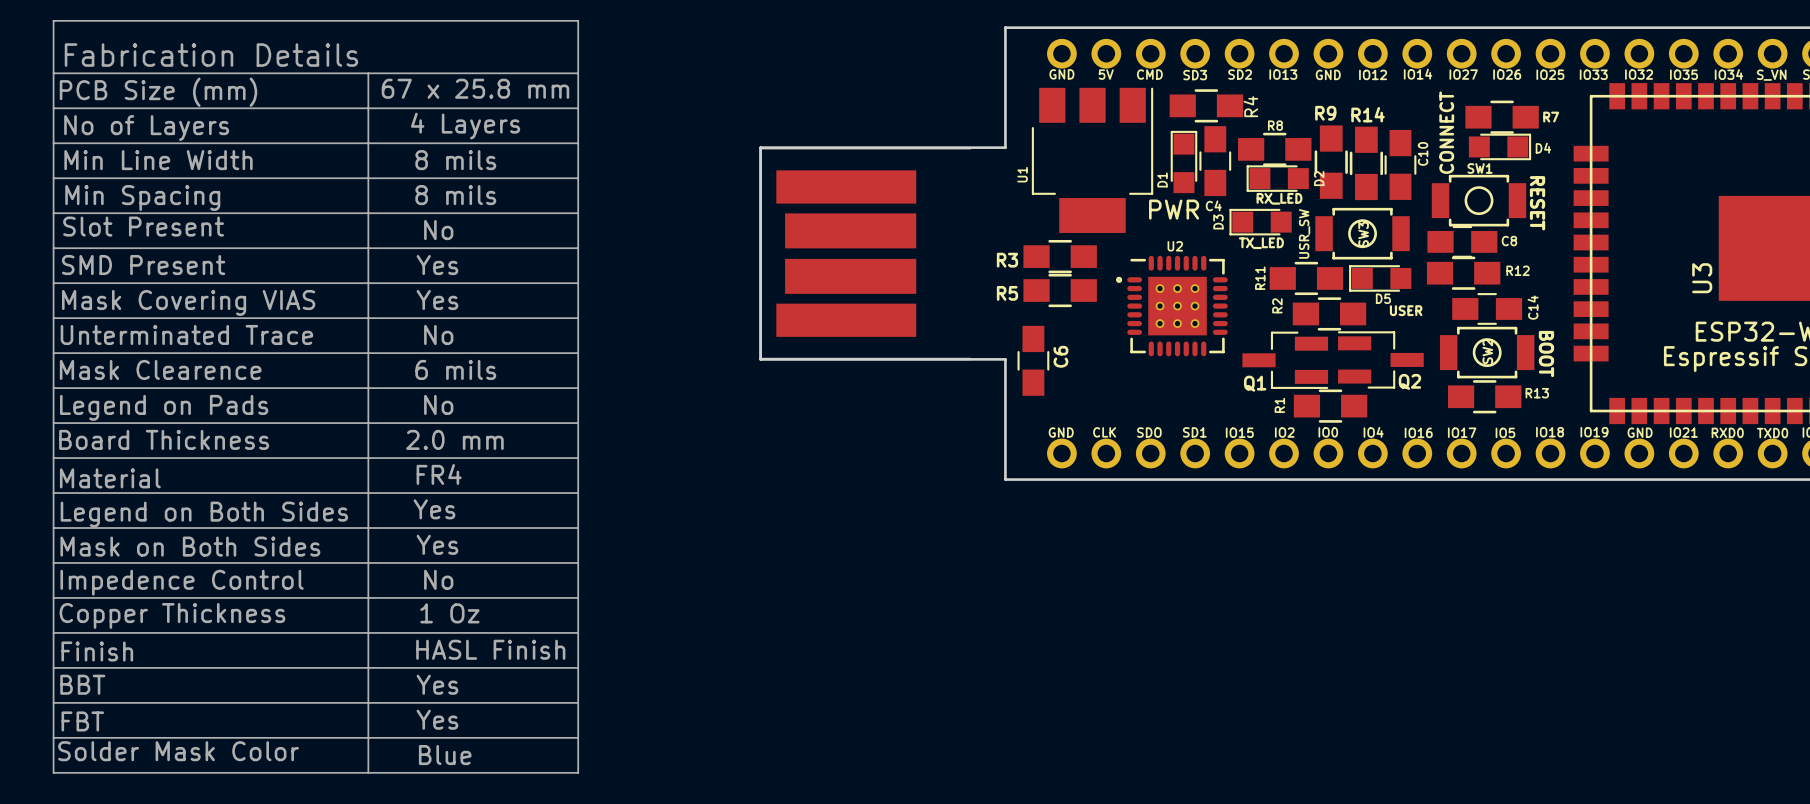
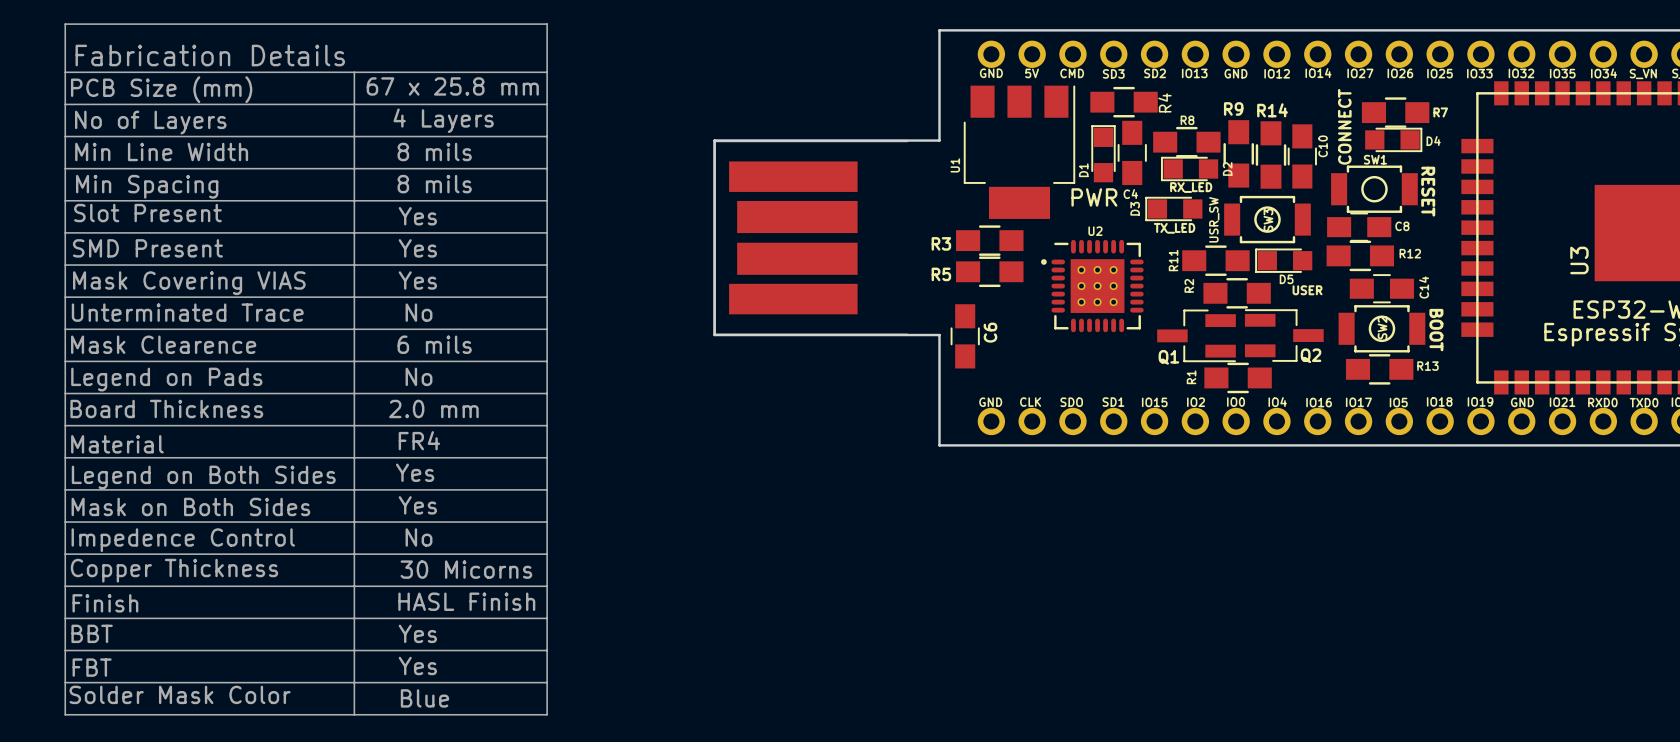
drawing shape: [52, 19, 580, 774] -> [64, 23, 548, 716]

